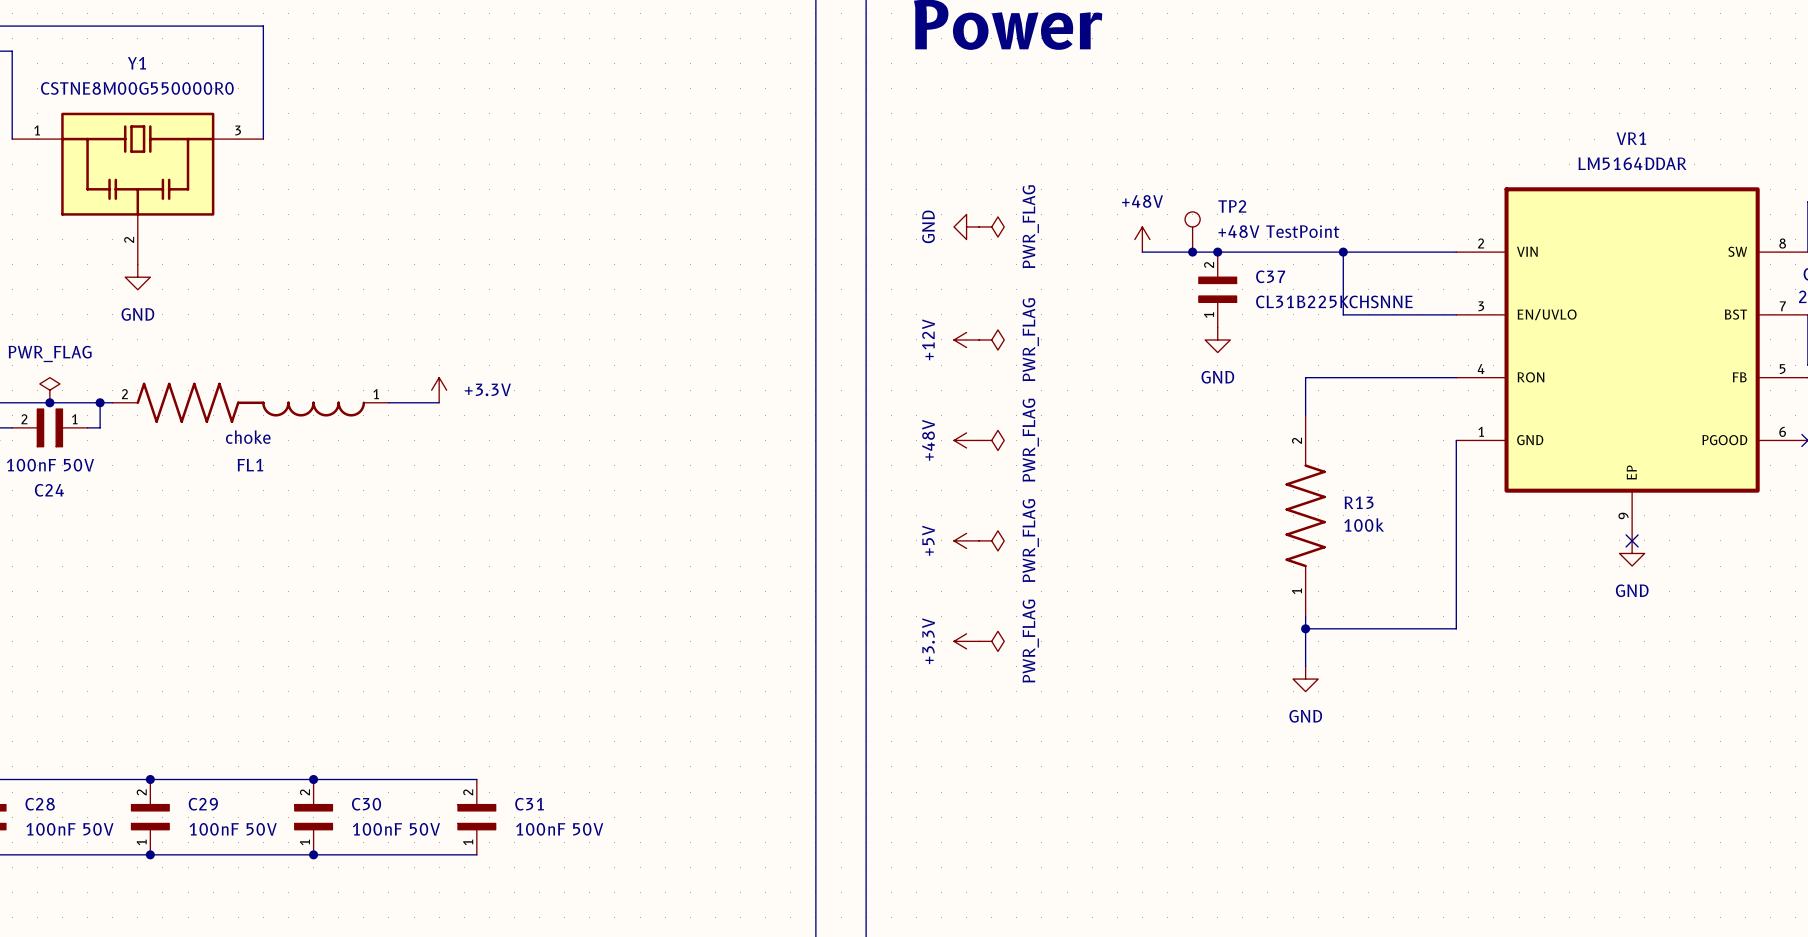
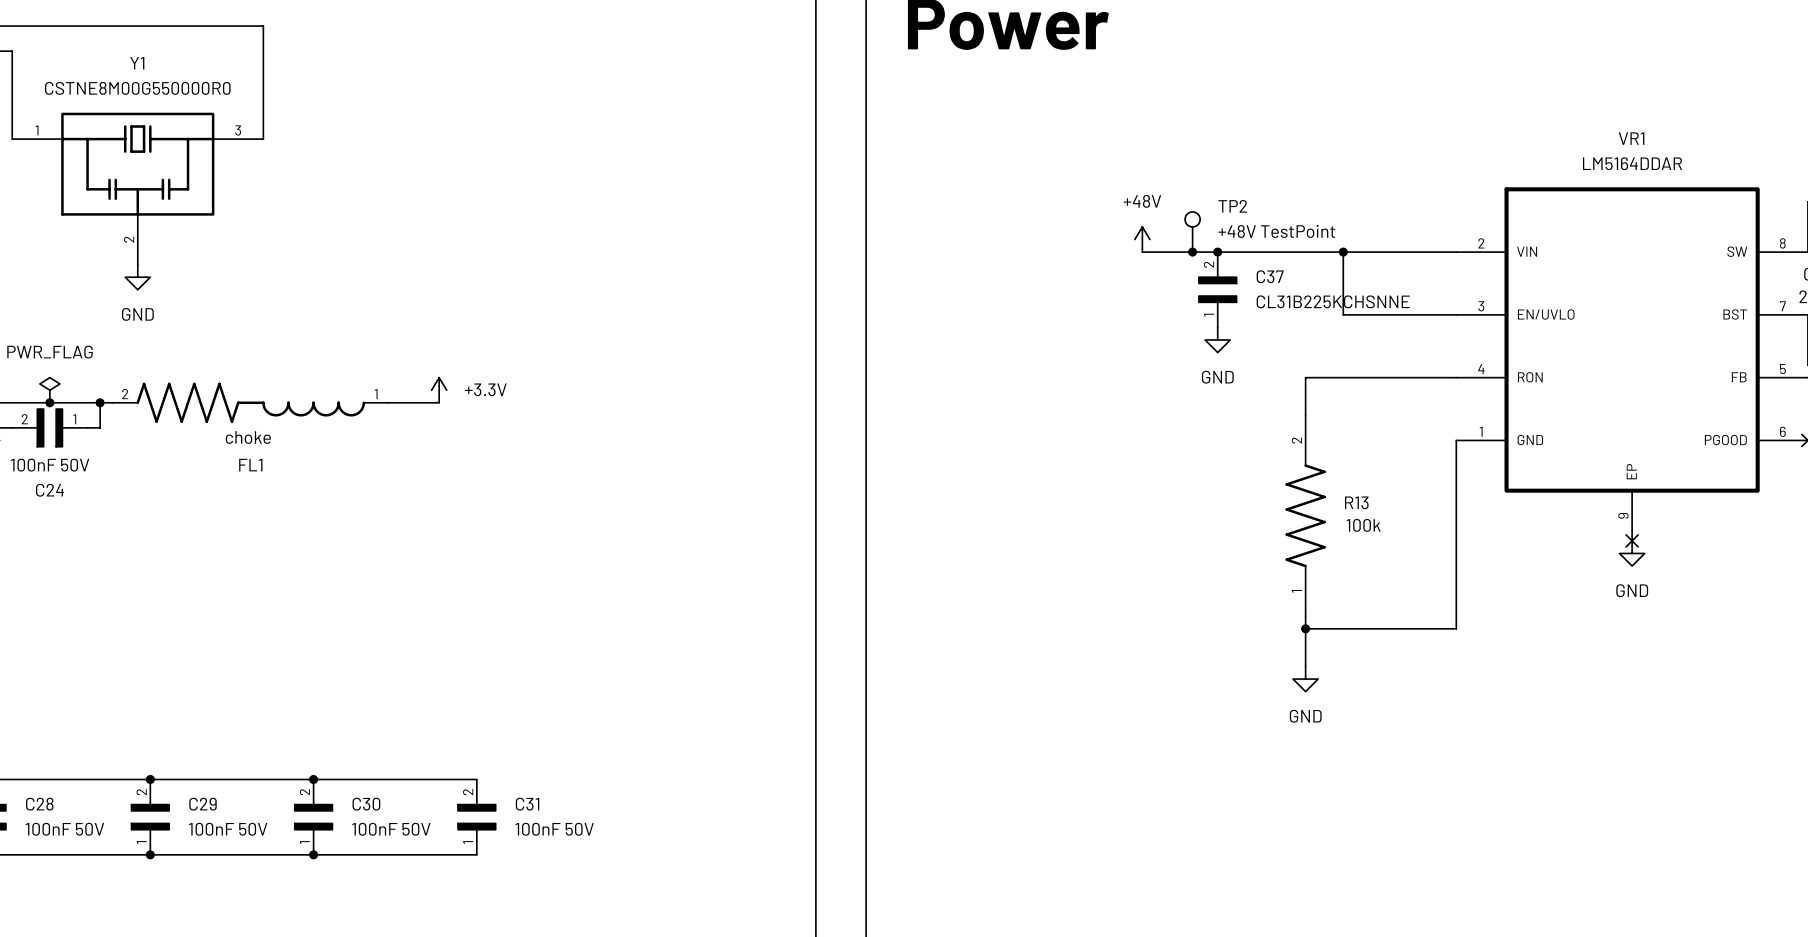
power symbol: GND (966, 226) -> none
power symbol: PWR_FLAG (991, 226) -> none
power symbol: +12V (966, 339) -> none
power symbol: PWR_FLAG (991, 339) -> none
power symbol: +48V (966, 440) -> none
power symbol: PWR_FLAG (991, 440) -> none
power symbol: +5V (966, 540) -> none
power symbol: PWR_FLAG (991, 540) -> none
power symbol: +3.3V (966, 641) -> none
power symbol: PWR_FLAG (991, 641) -> none

